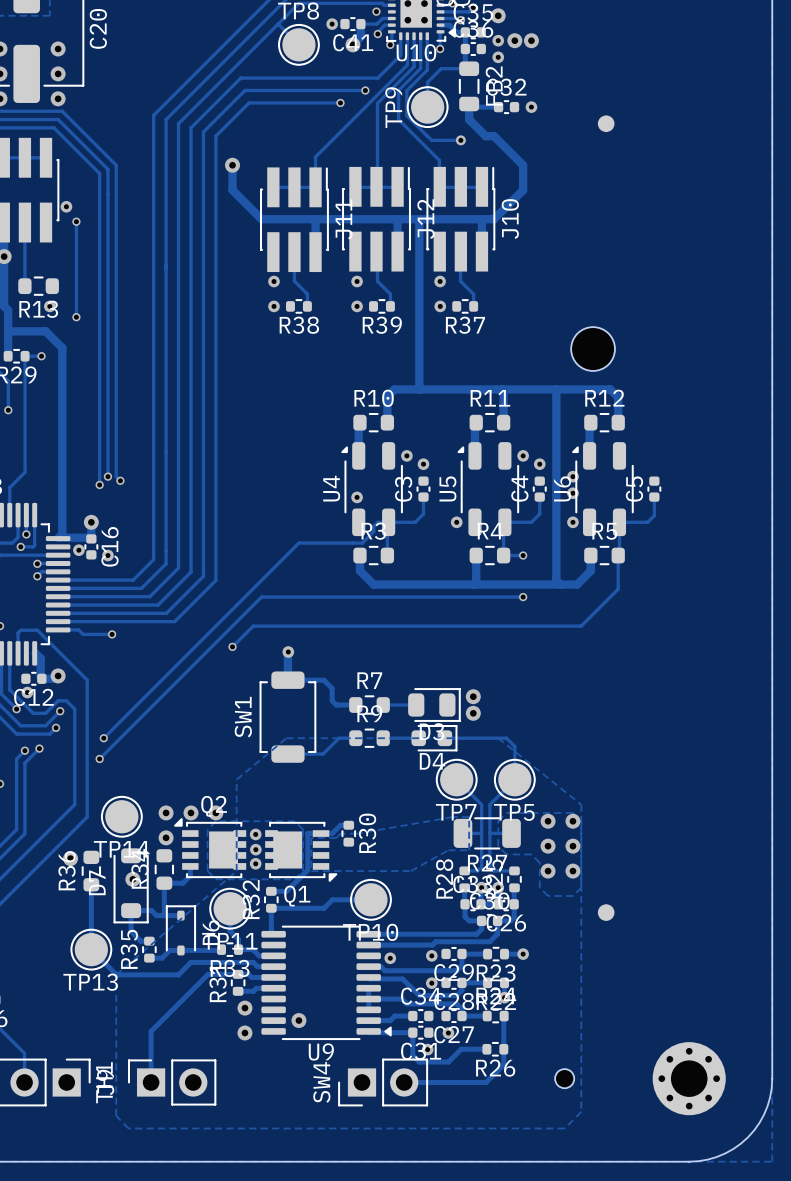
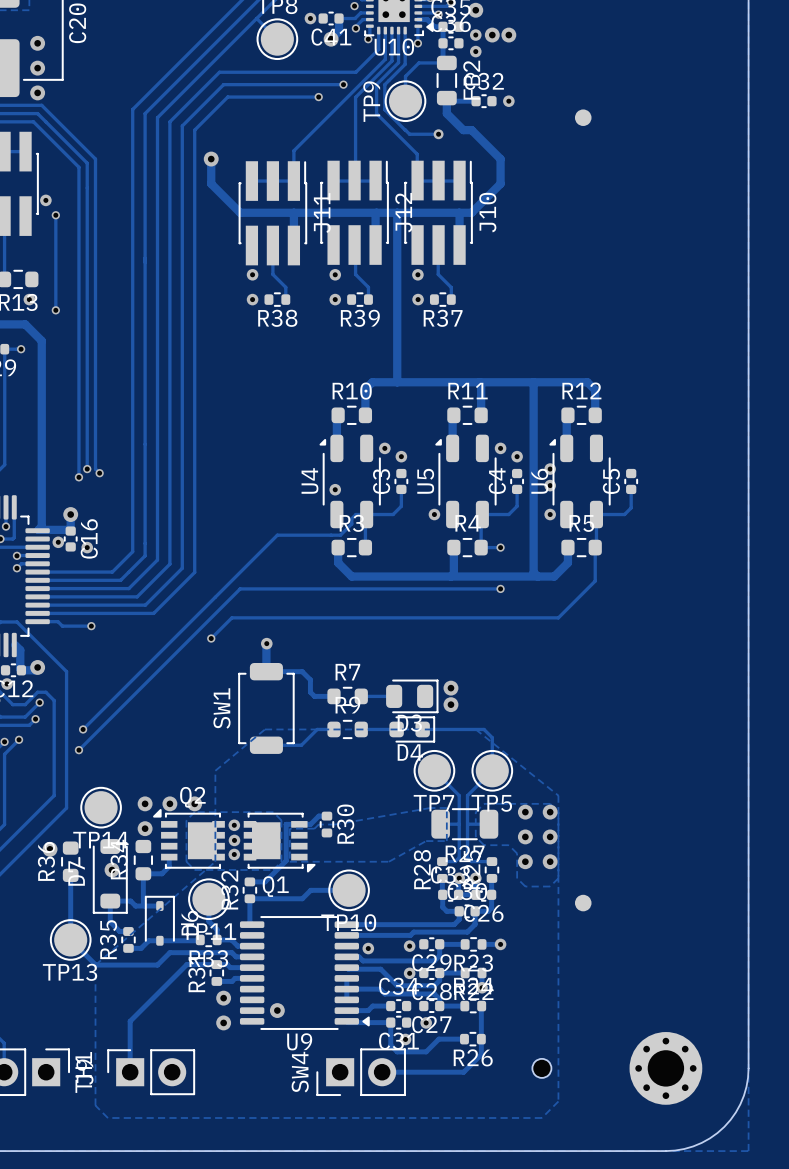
part: (593, 349) -> none

